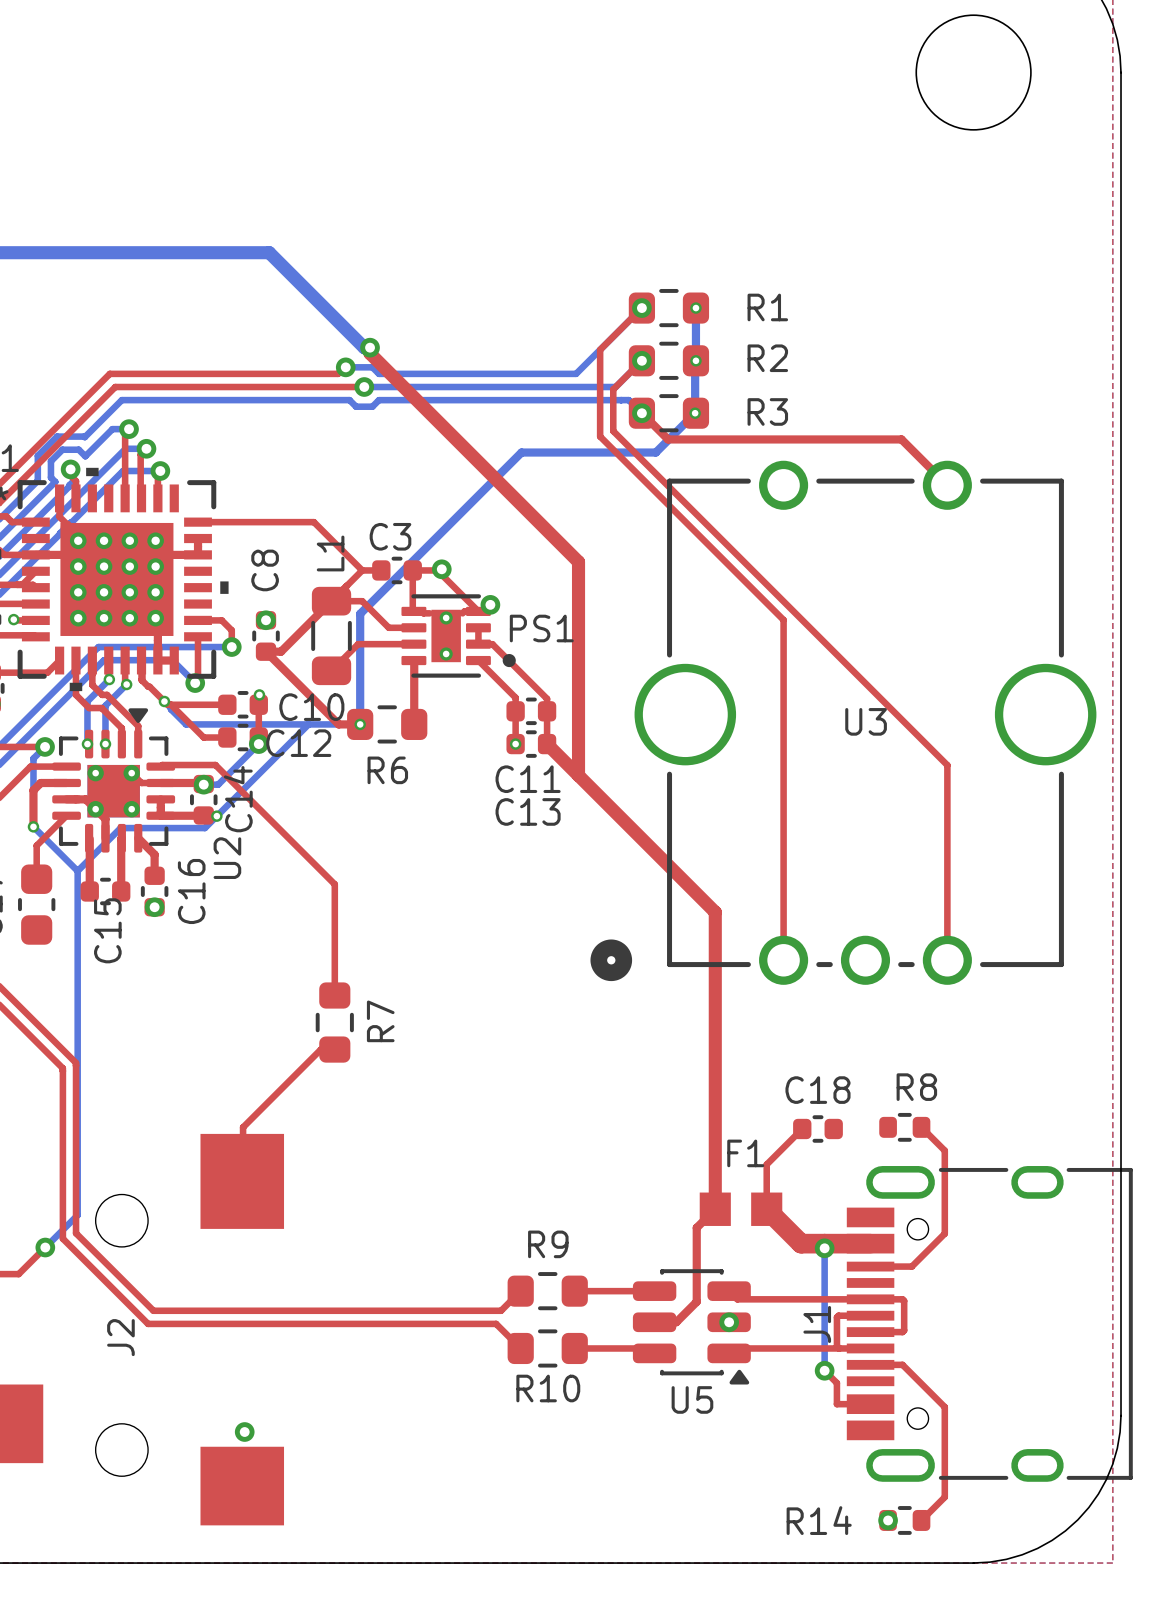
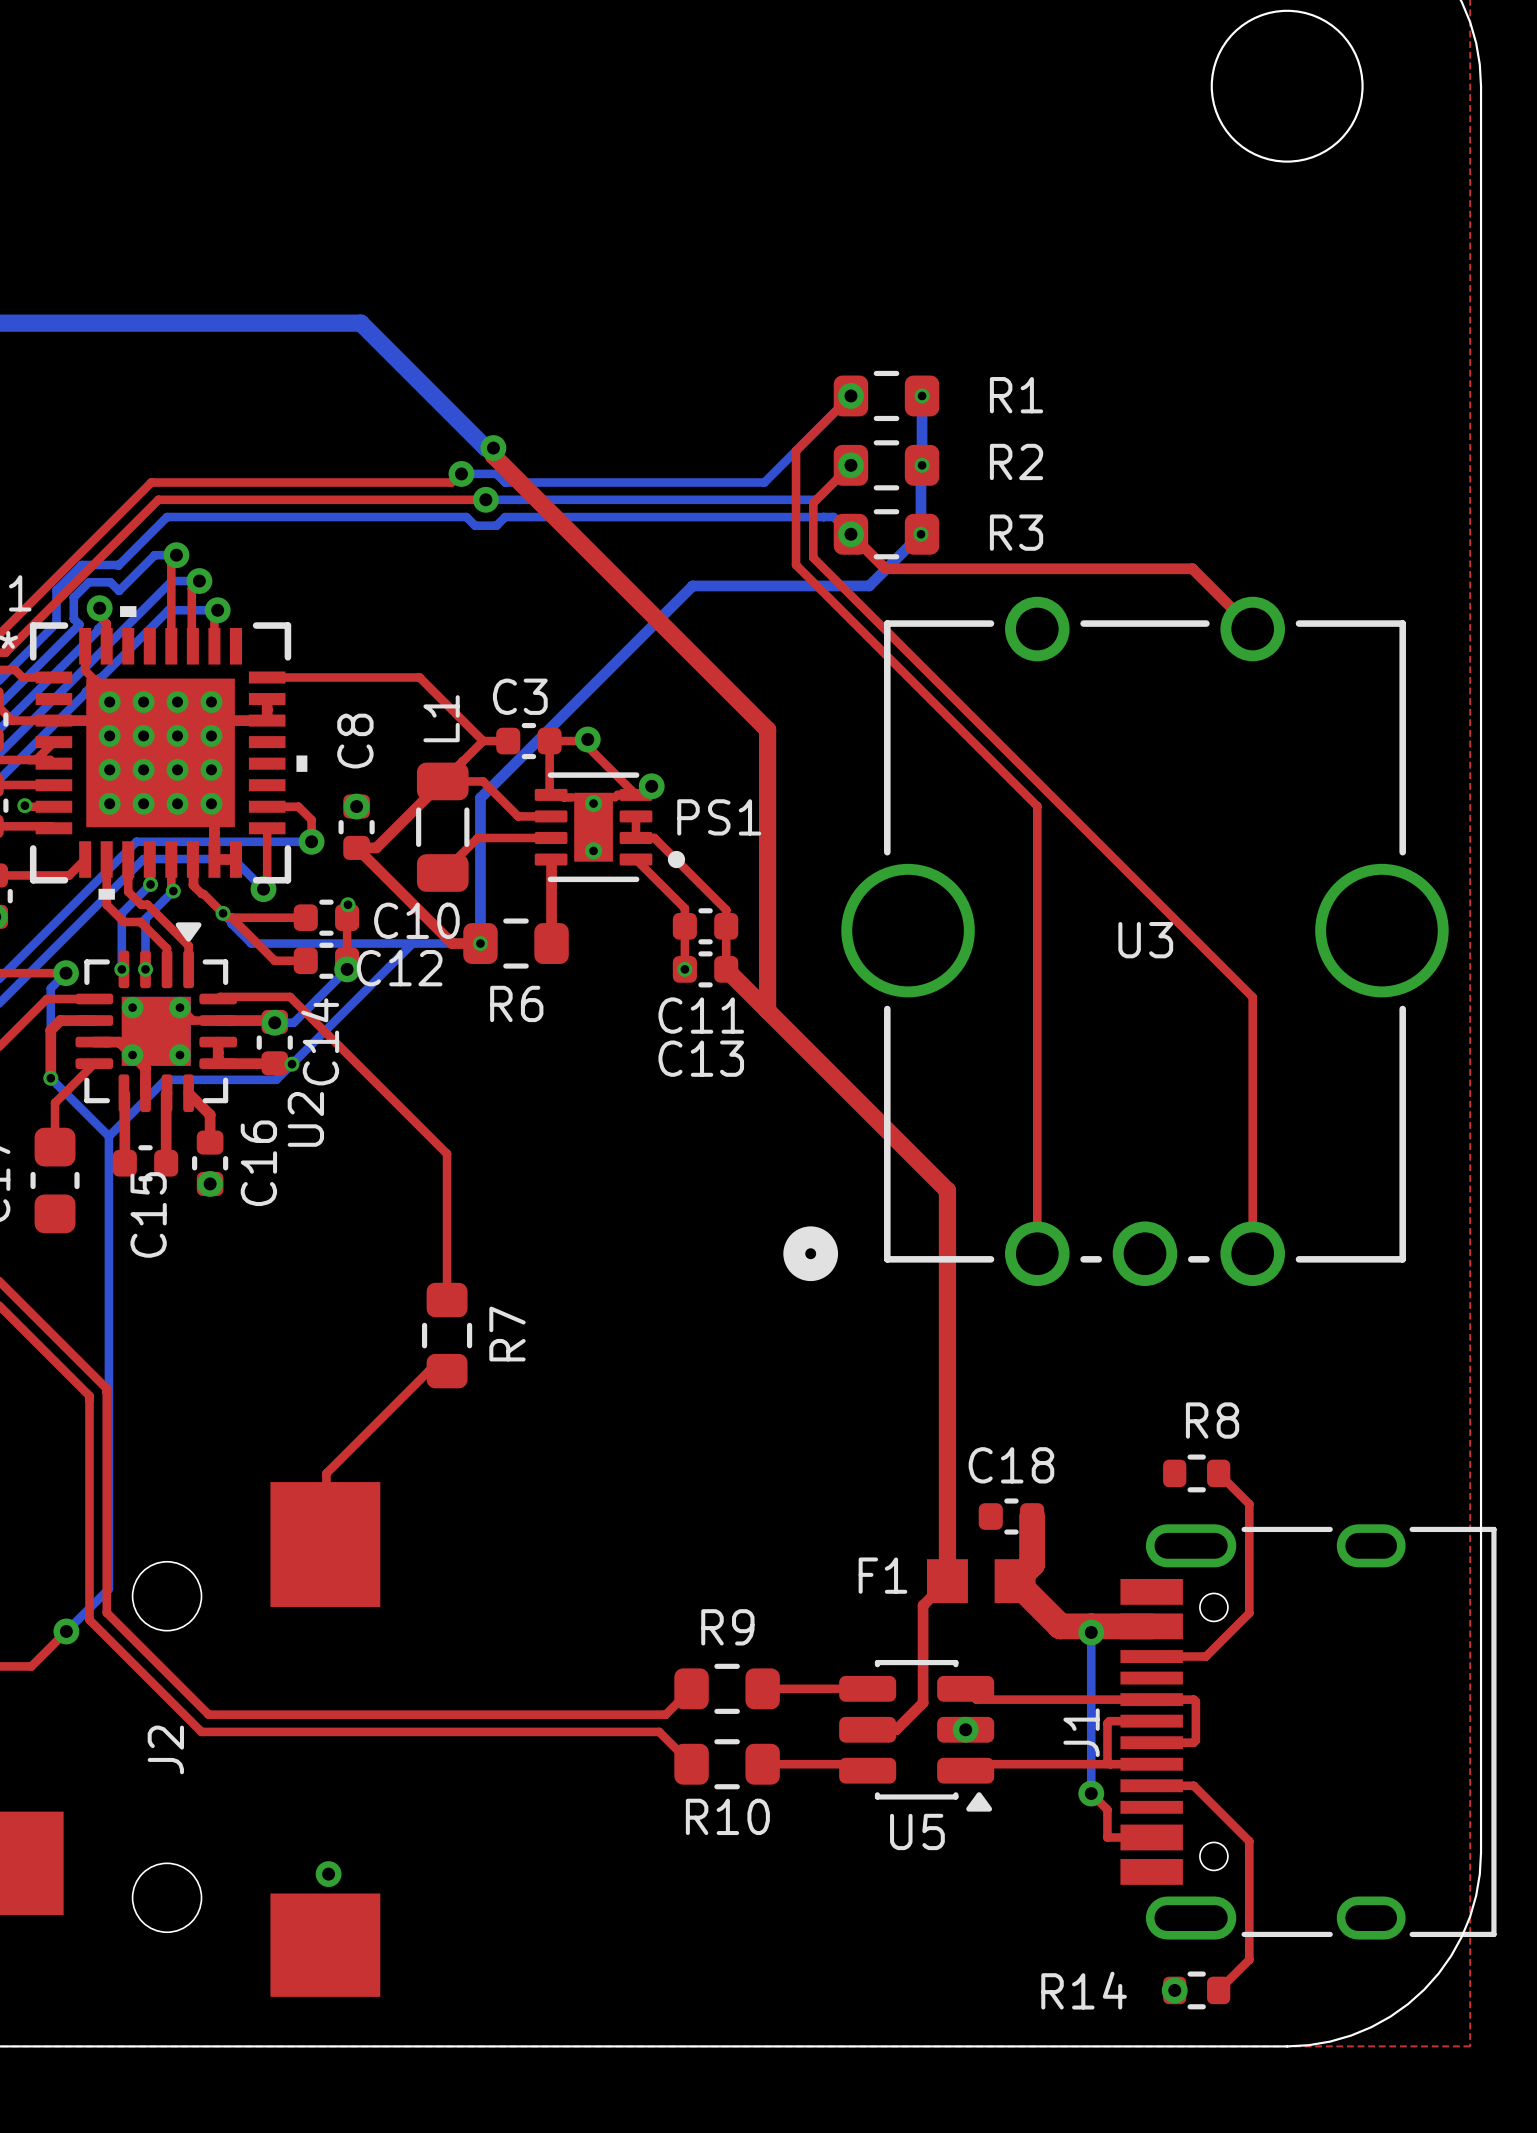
top track: (802, 1128) (766, 1164) (766, 1209) -> (1032, 1516) (1032, 1564) (1015, 1581)
C18 position: (817, 1128) -> (1011, 1516)
F1 name position: F1 (745, 1153) -> F1 (882, 1575)

